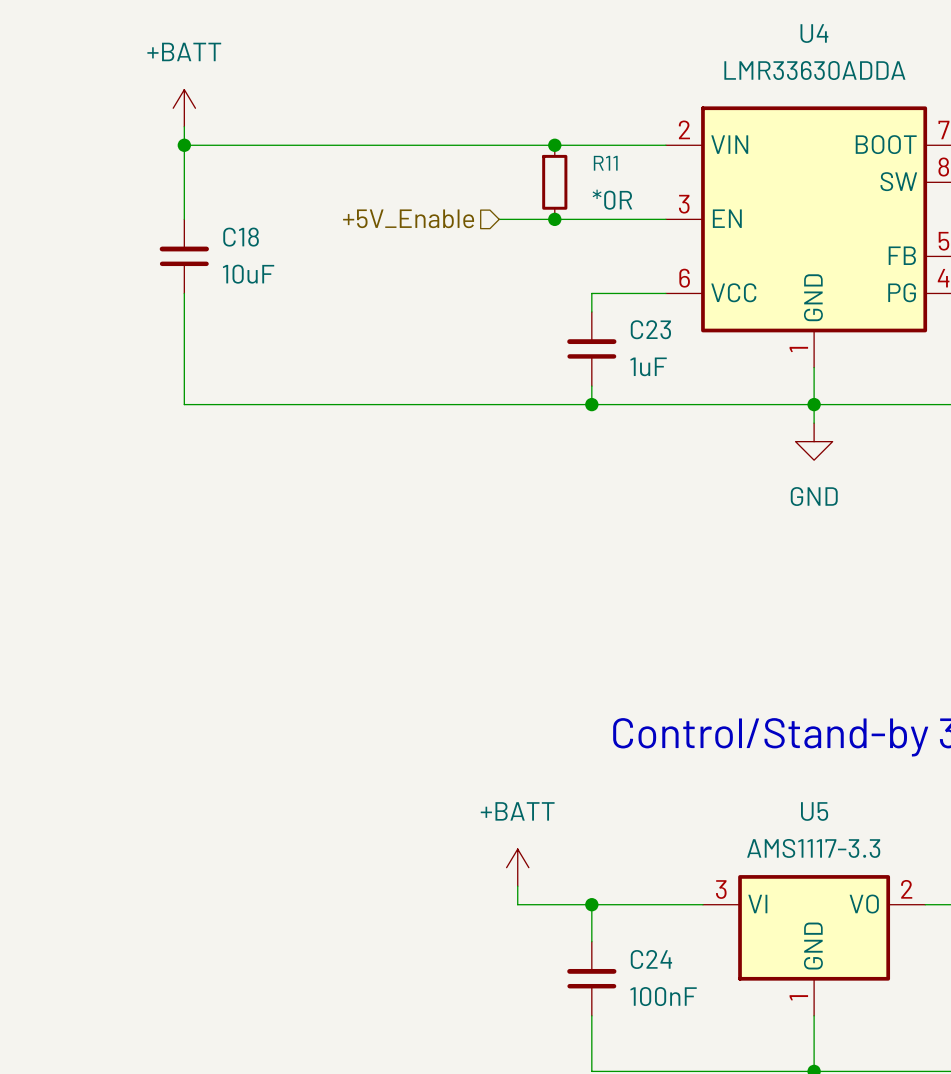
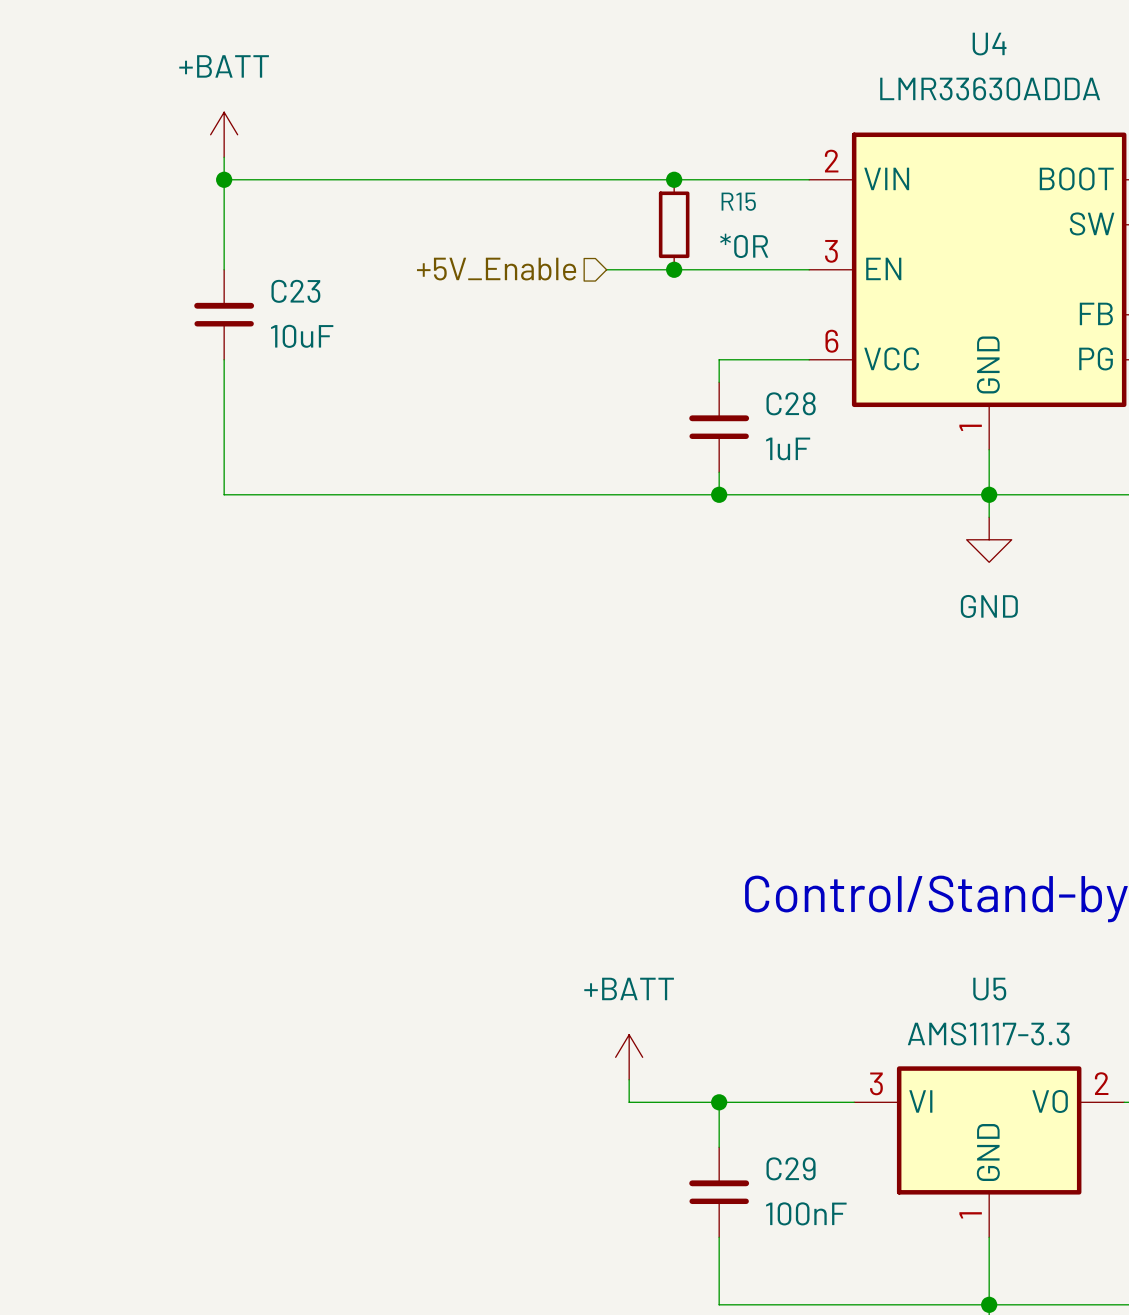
R11 name: R11 (605, 163) -> R15 (738, 201)
C18 name: C18 (241, 237) -> C23 (295, 291)
C23 name: C23 (650, 329) -> C28 (791, 403)
C24 name: C24 (651, 959) -> C29 (791, 1168)

